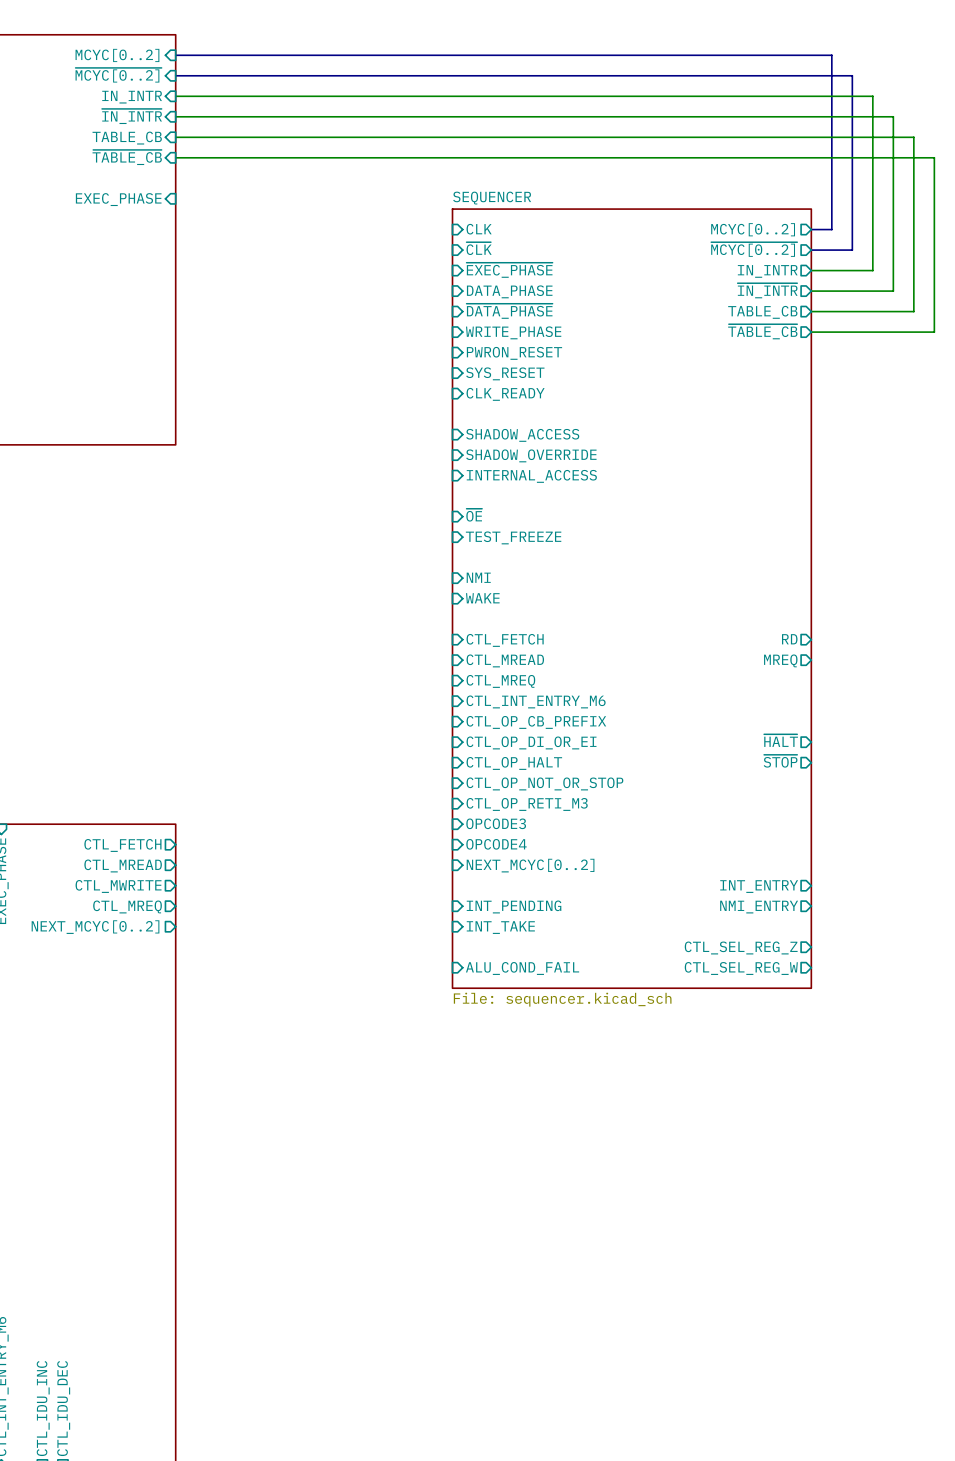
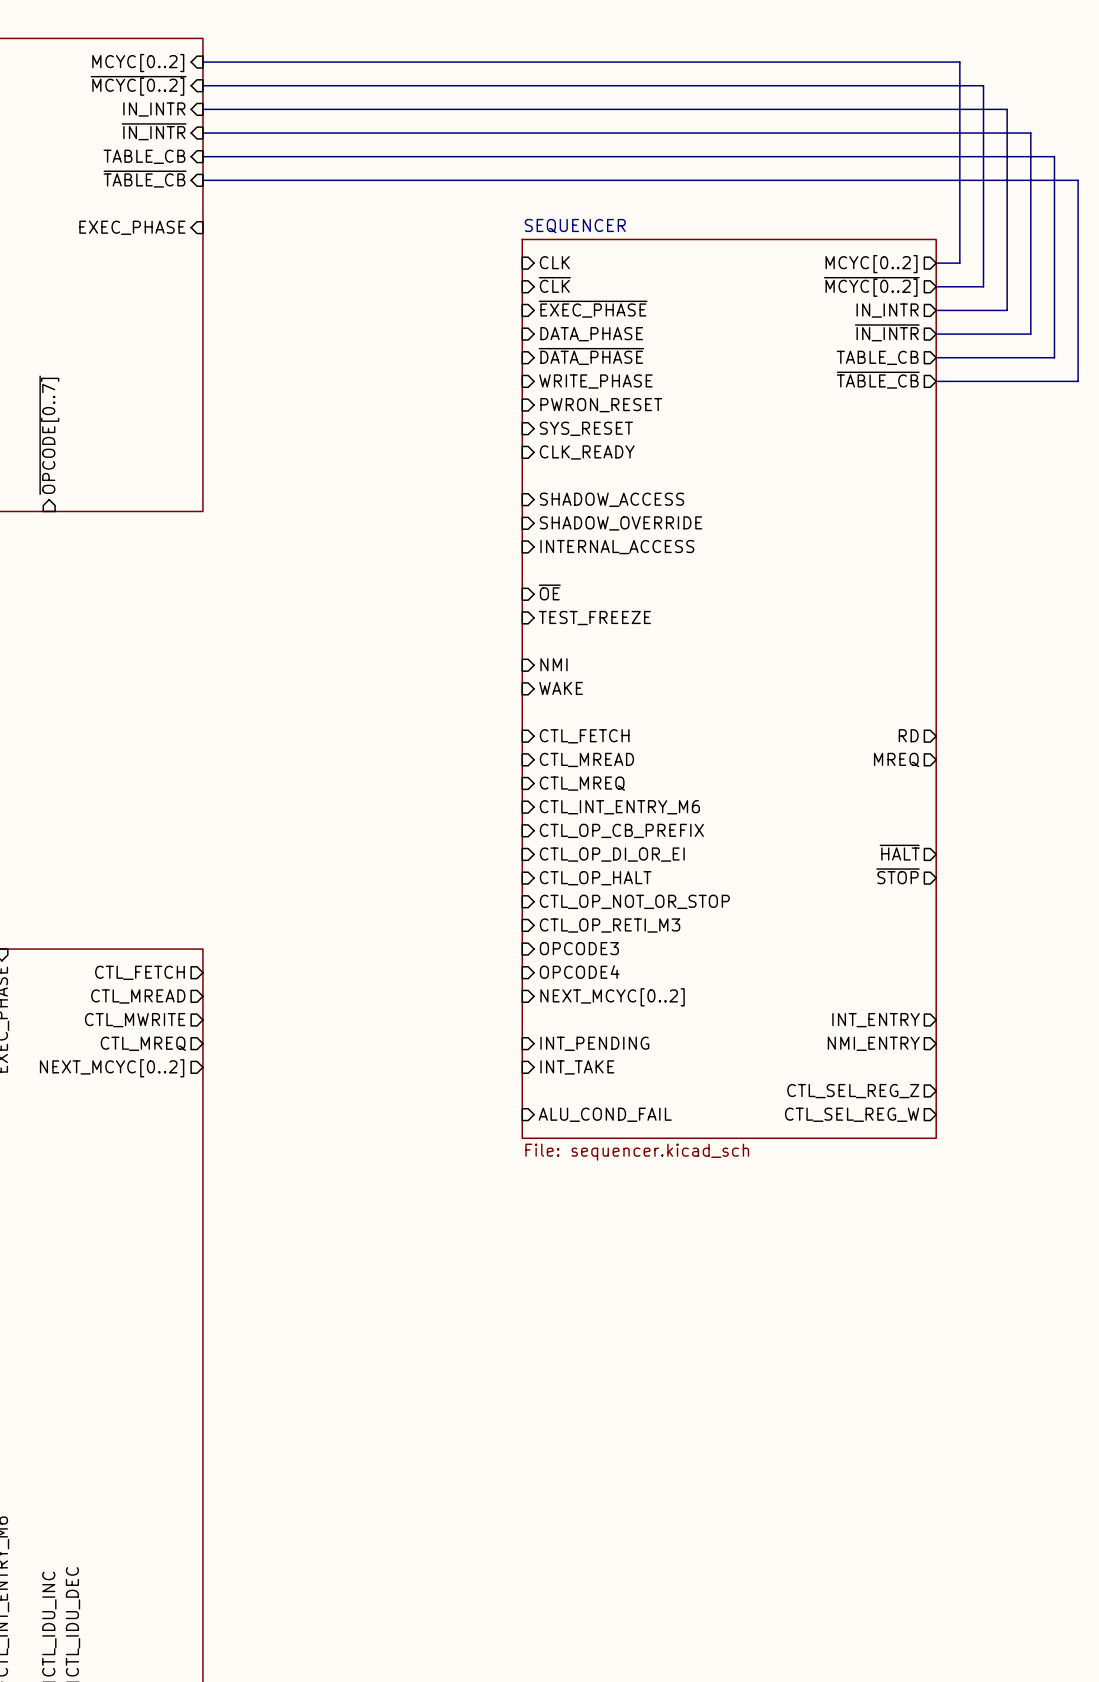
sheet pin: none -> ~{OPCODE[0..7]} (49, 435)

